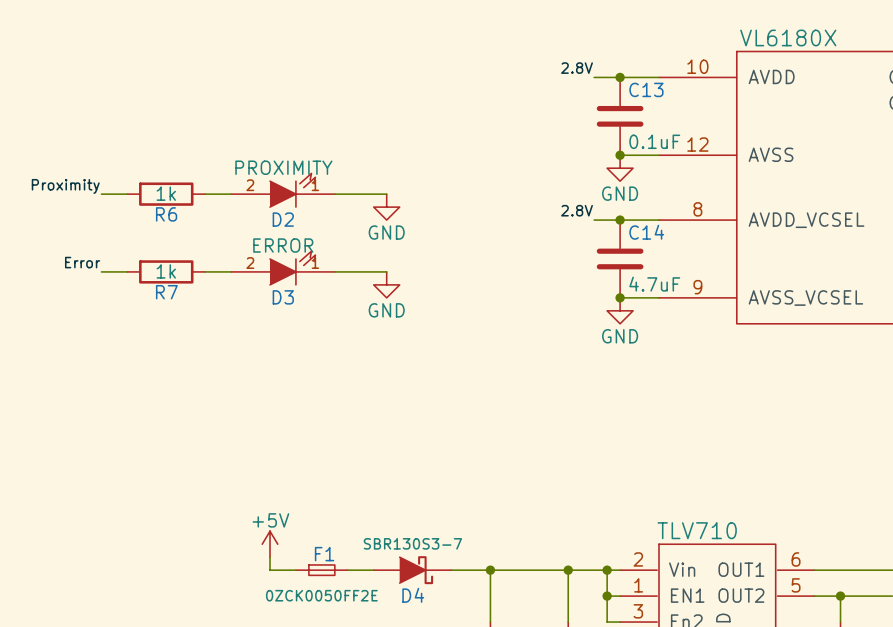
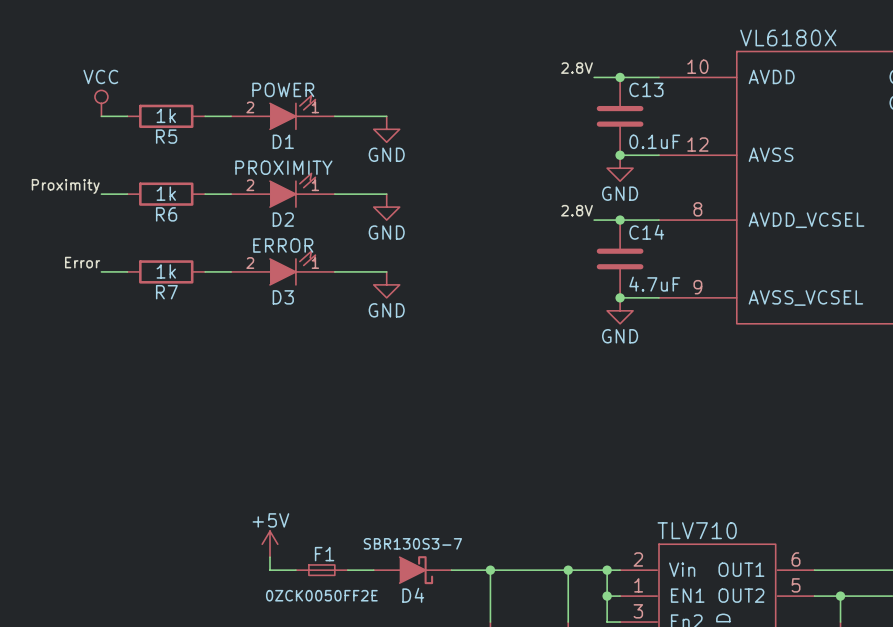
power symbol: none -> VCC (101, 103)
D1: none -> POWER (282, 112)
wire: none -> (101, 116) (127, 116)
R5: none -> 1k (166, 116)
wire: none -> (205, 116) (231, 116)
wire: none -> (334, 116) (386, 116)
power symbol: none -> GND (386, 129)

